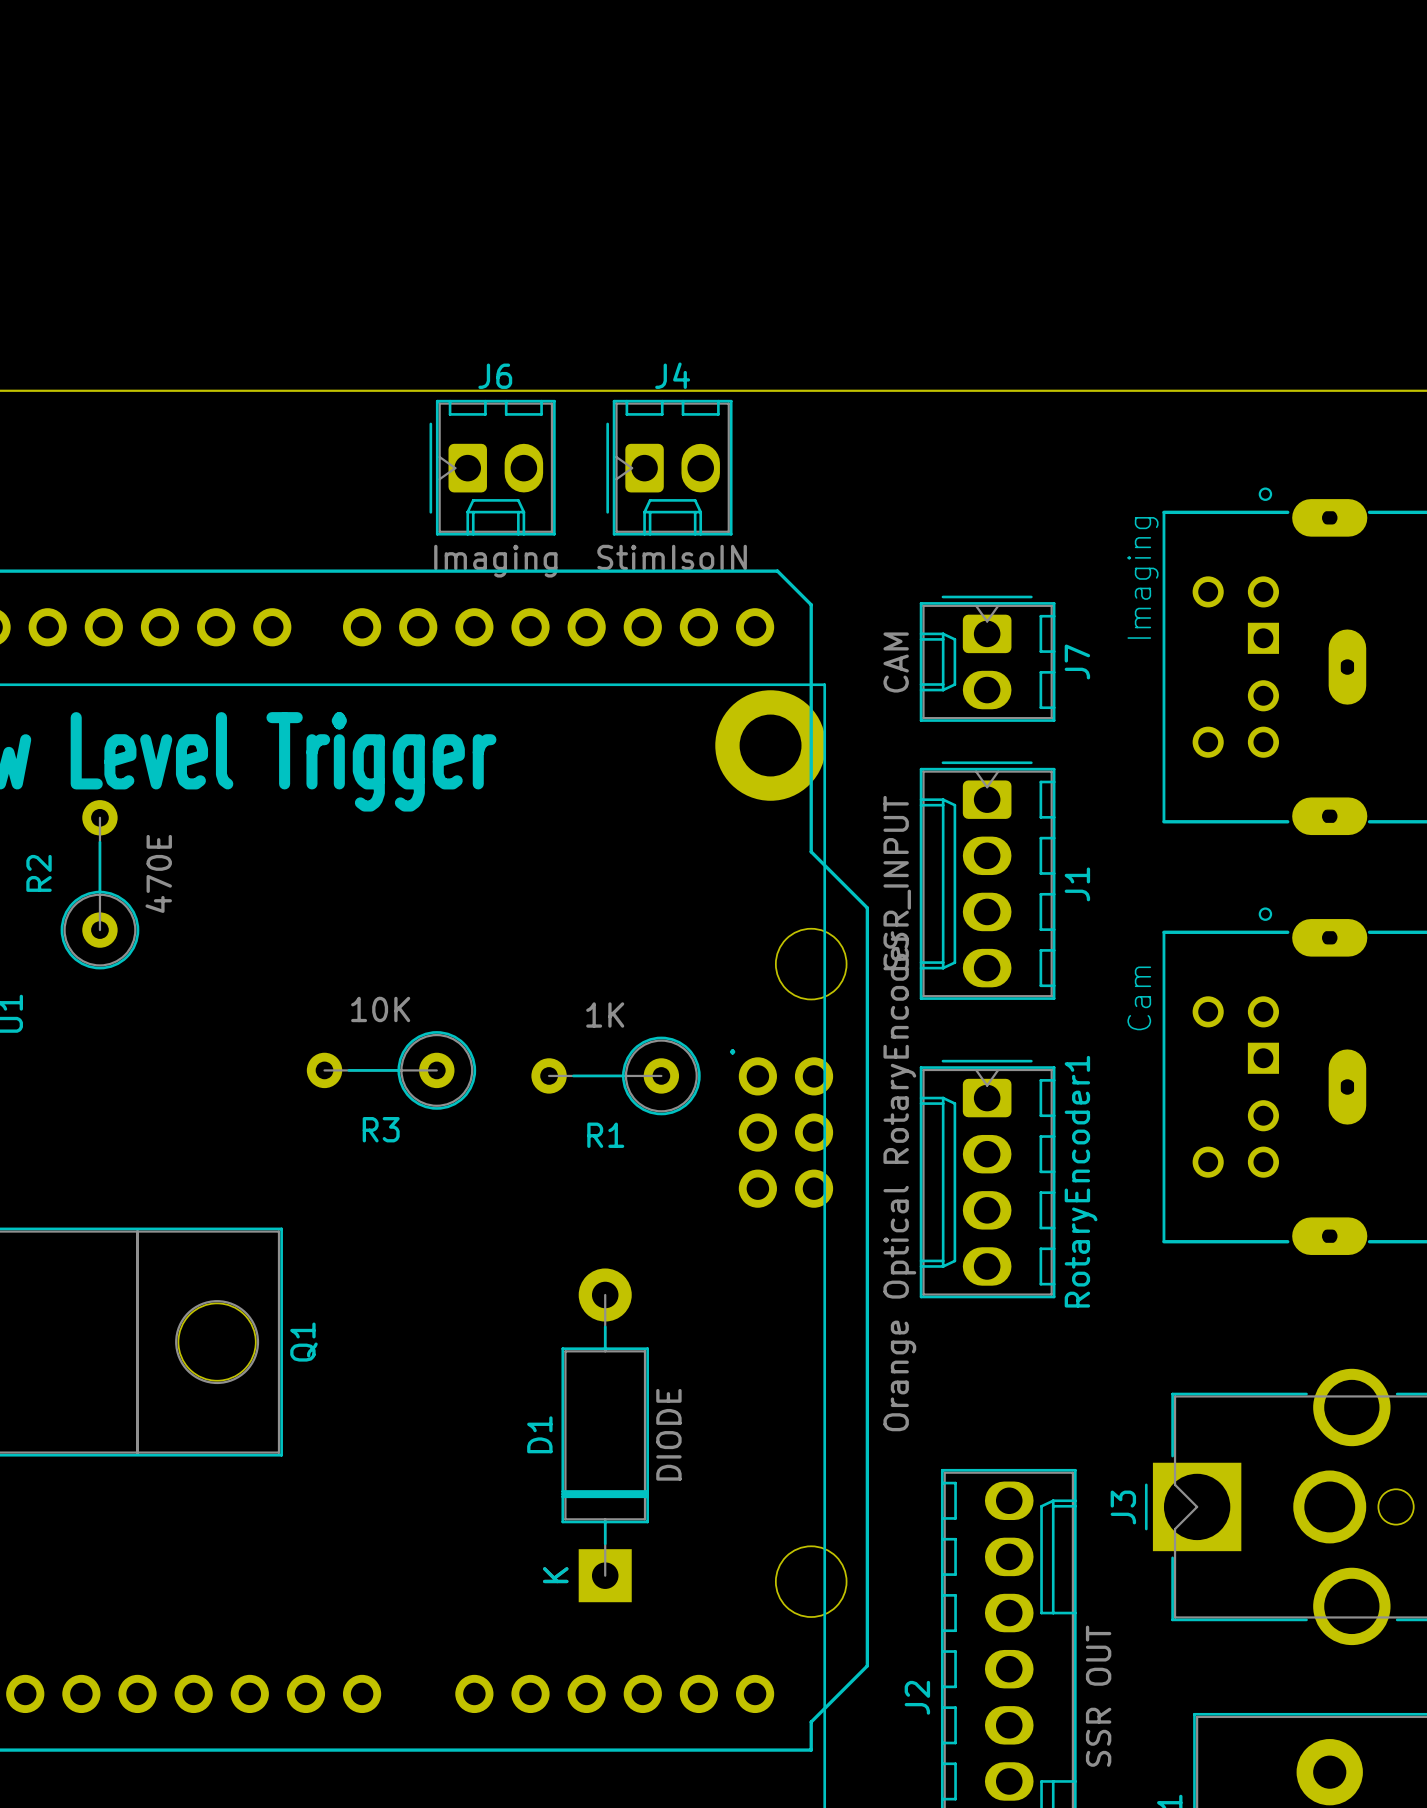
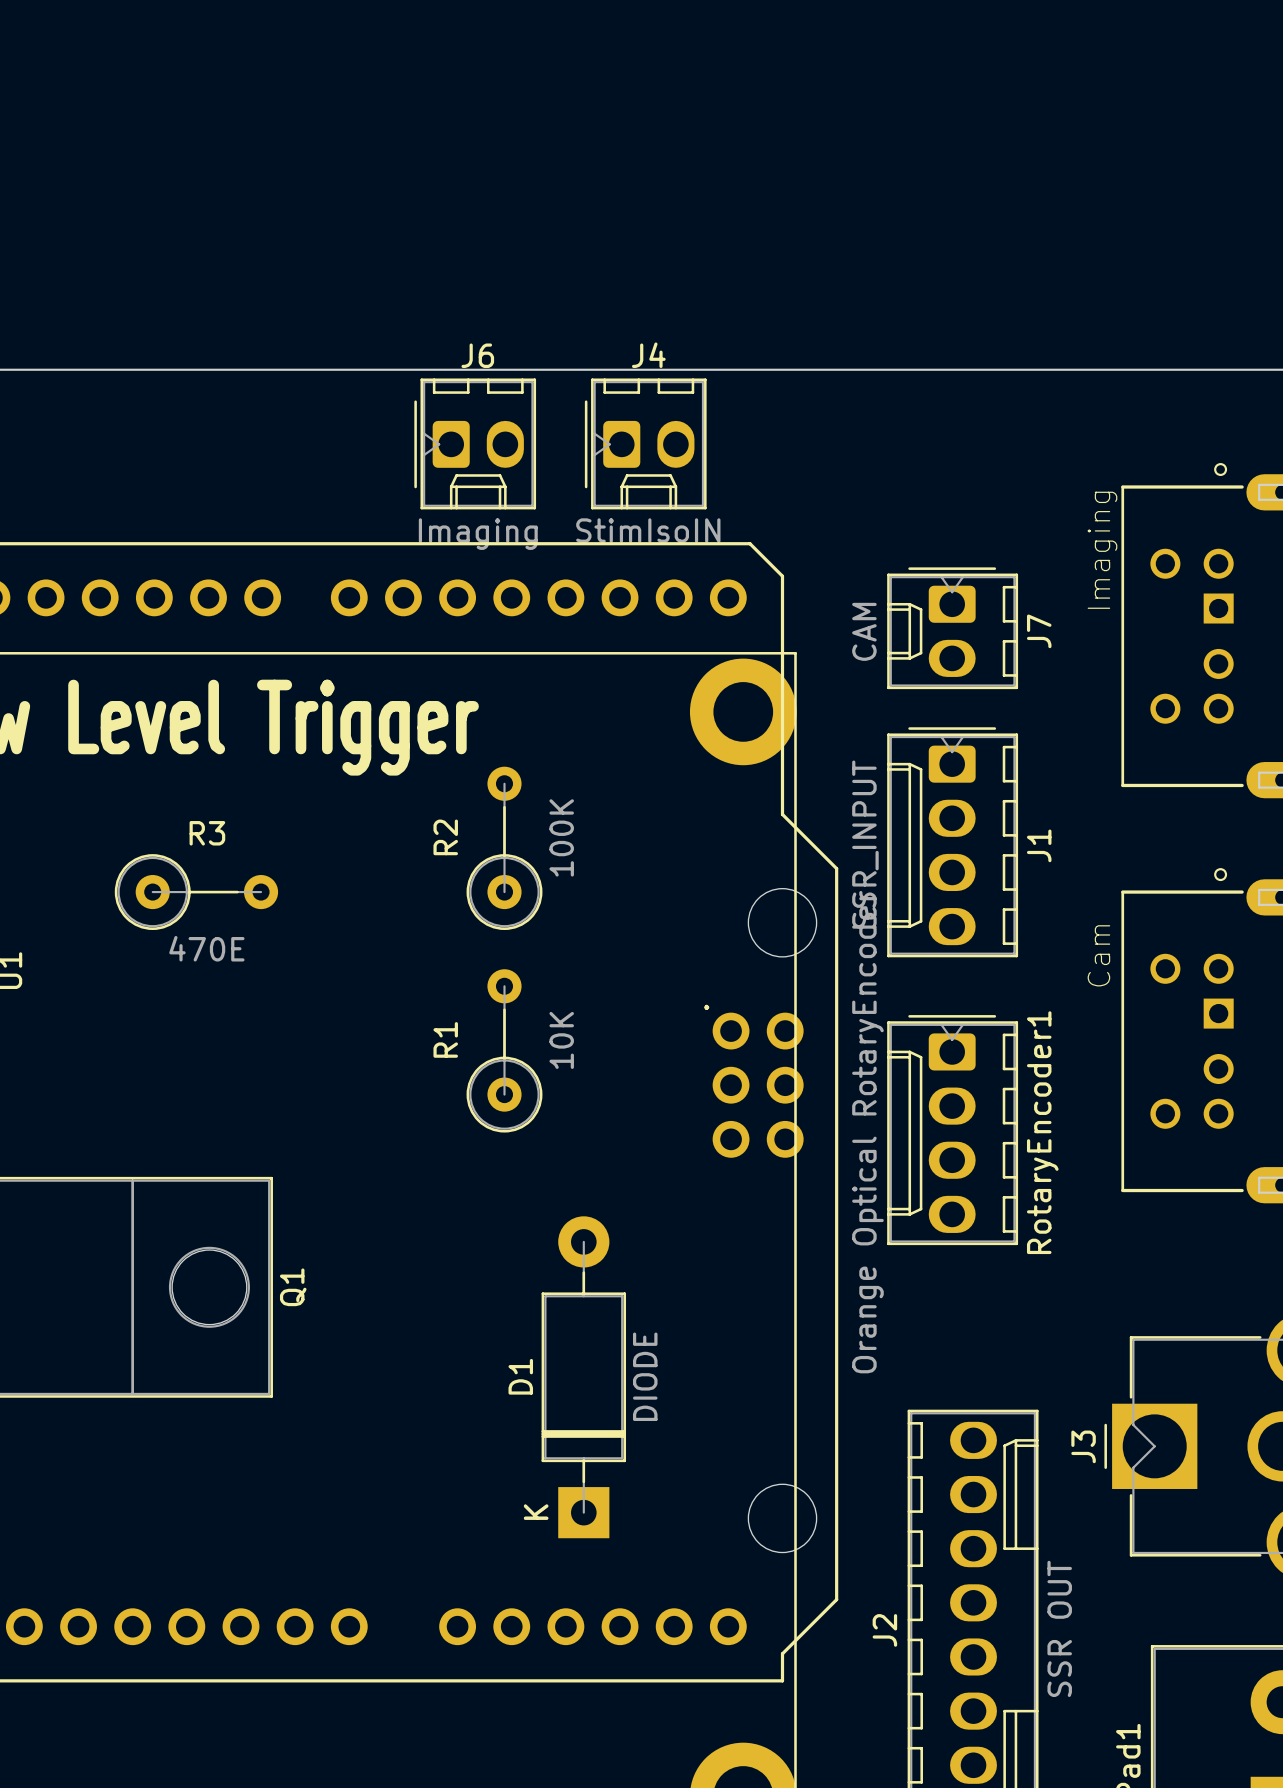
R2 value: 470E (158, 873) -> 100K (561, 837)
R2 position: (99, 884) -> (504, 848)
R3 value: 10K (380, 1009) -> 470E (206, 948)
R1 value: 1K (605, 1015) -> 10K (561, 1040)
R3 rotation: 0° (391, 1070) -> 180° (196, 892)
R3 position: (391, 1070) -> (196, 892)
R1 rotation: 0° (616, 1075) -> 90° clockwise (504, 1050)

